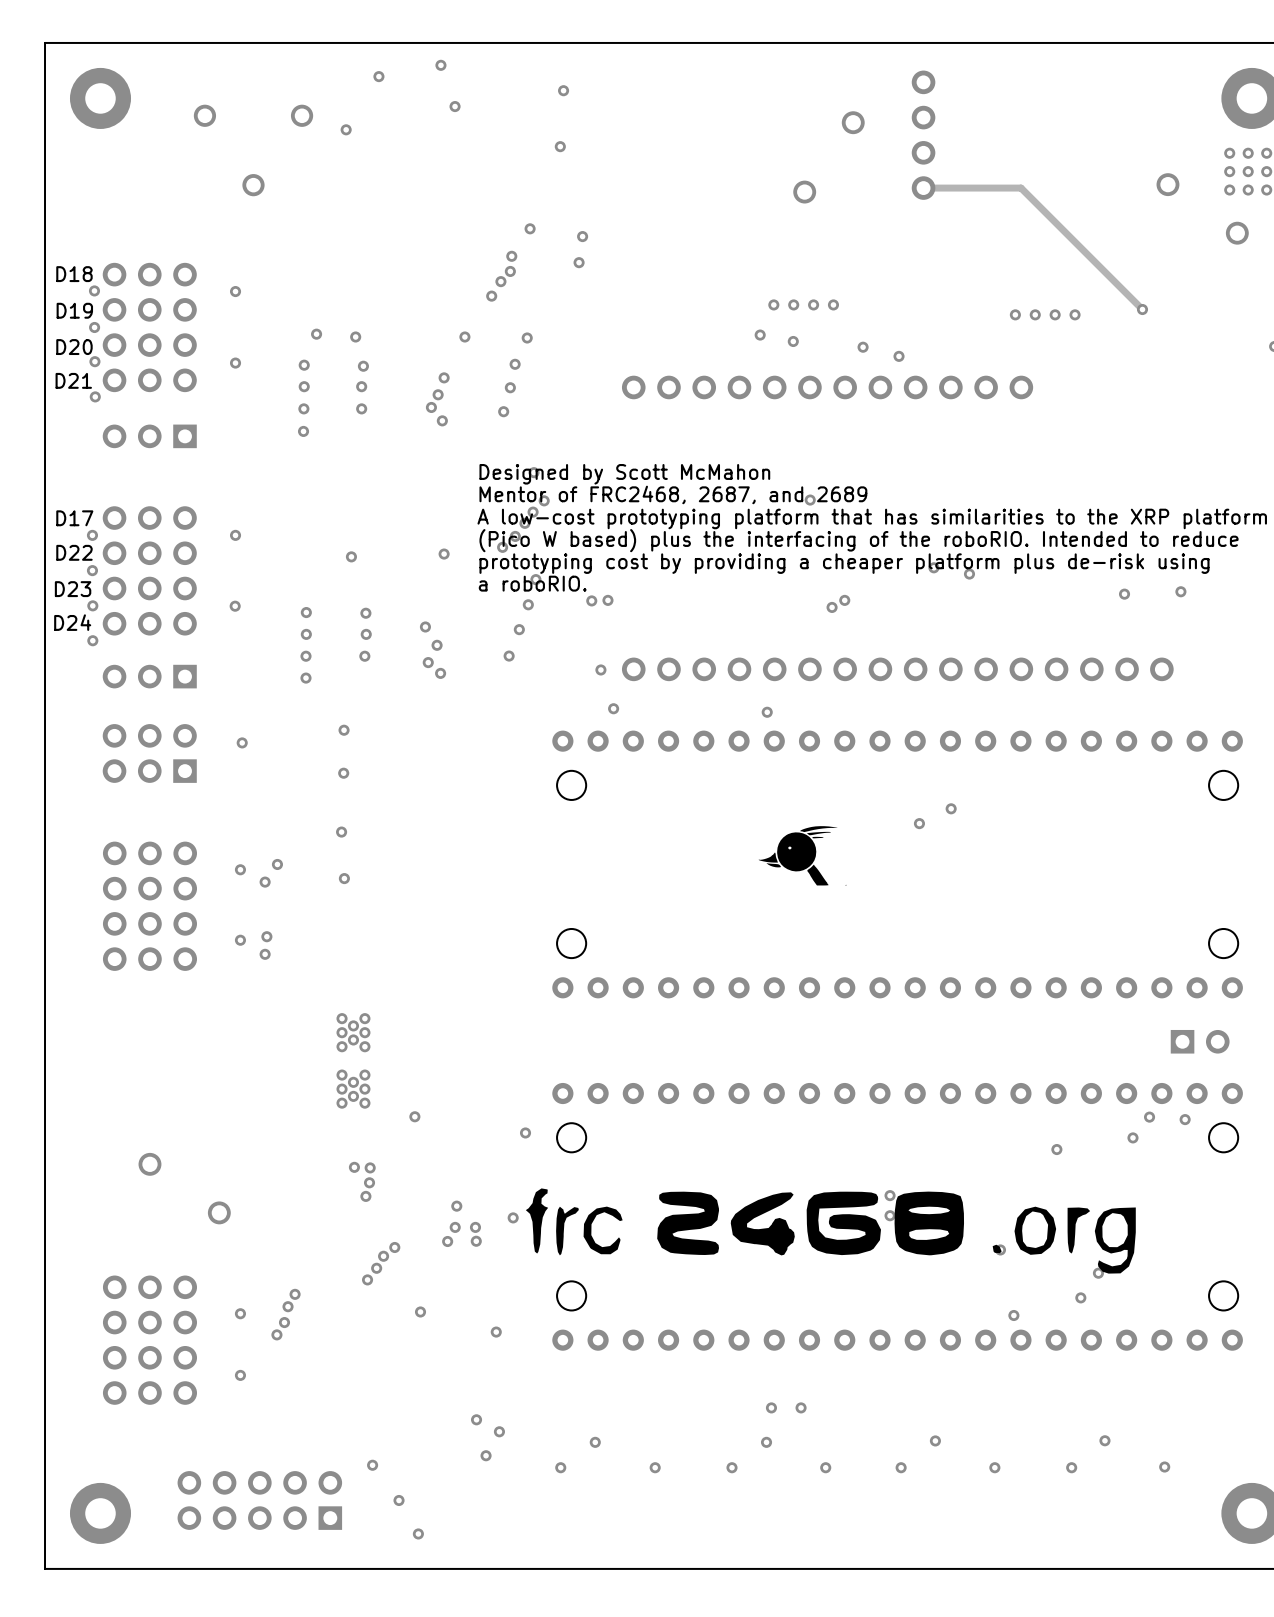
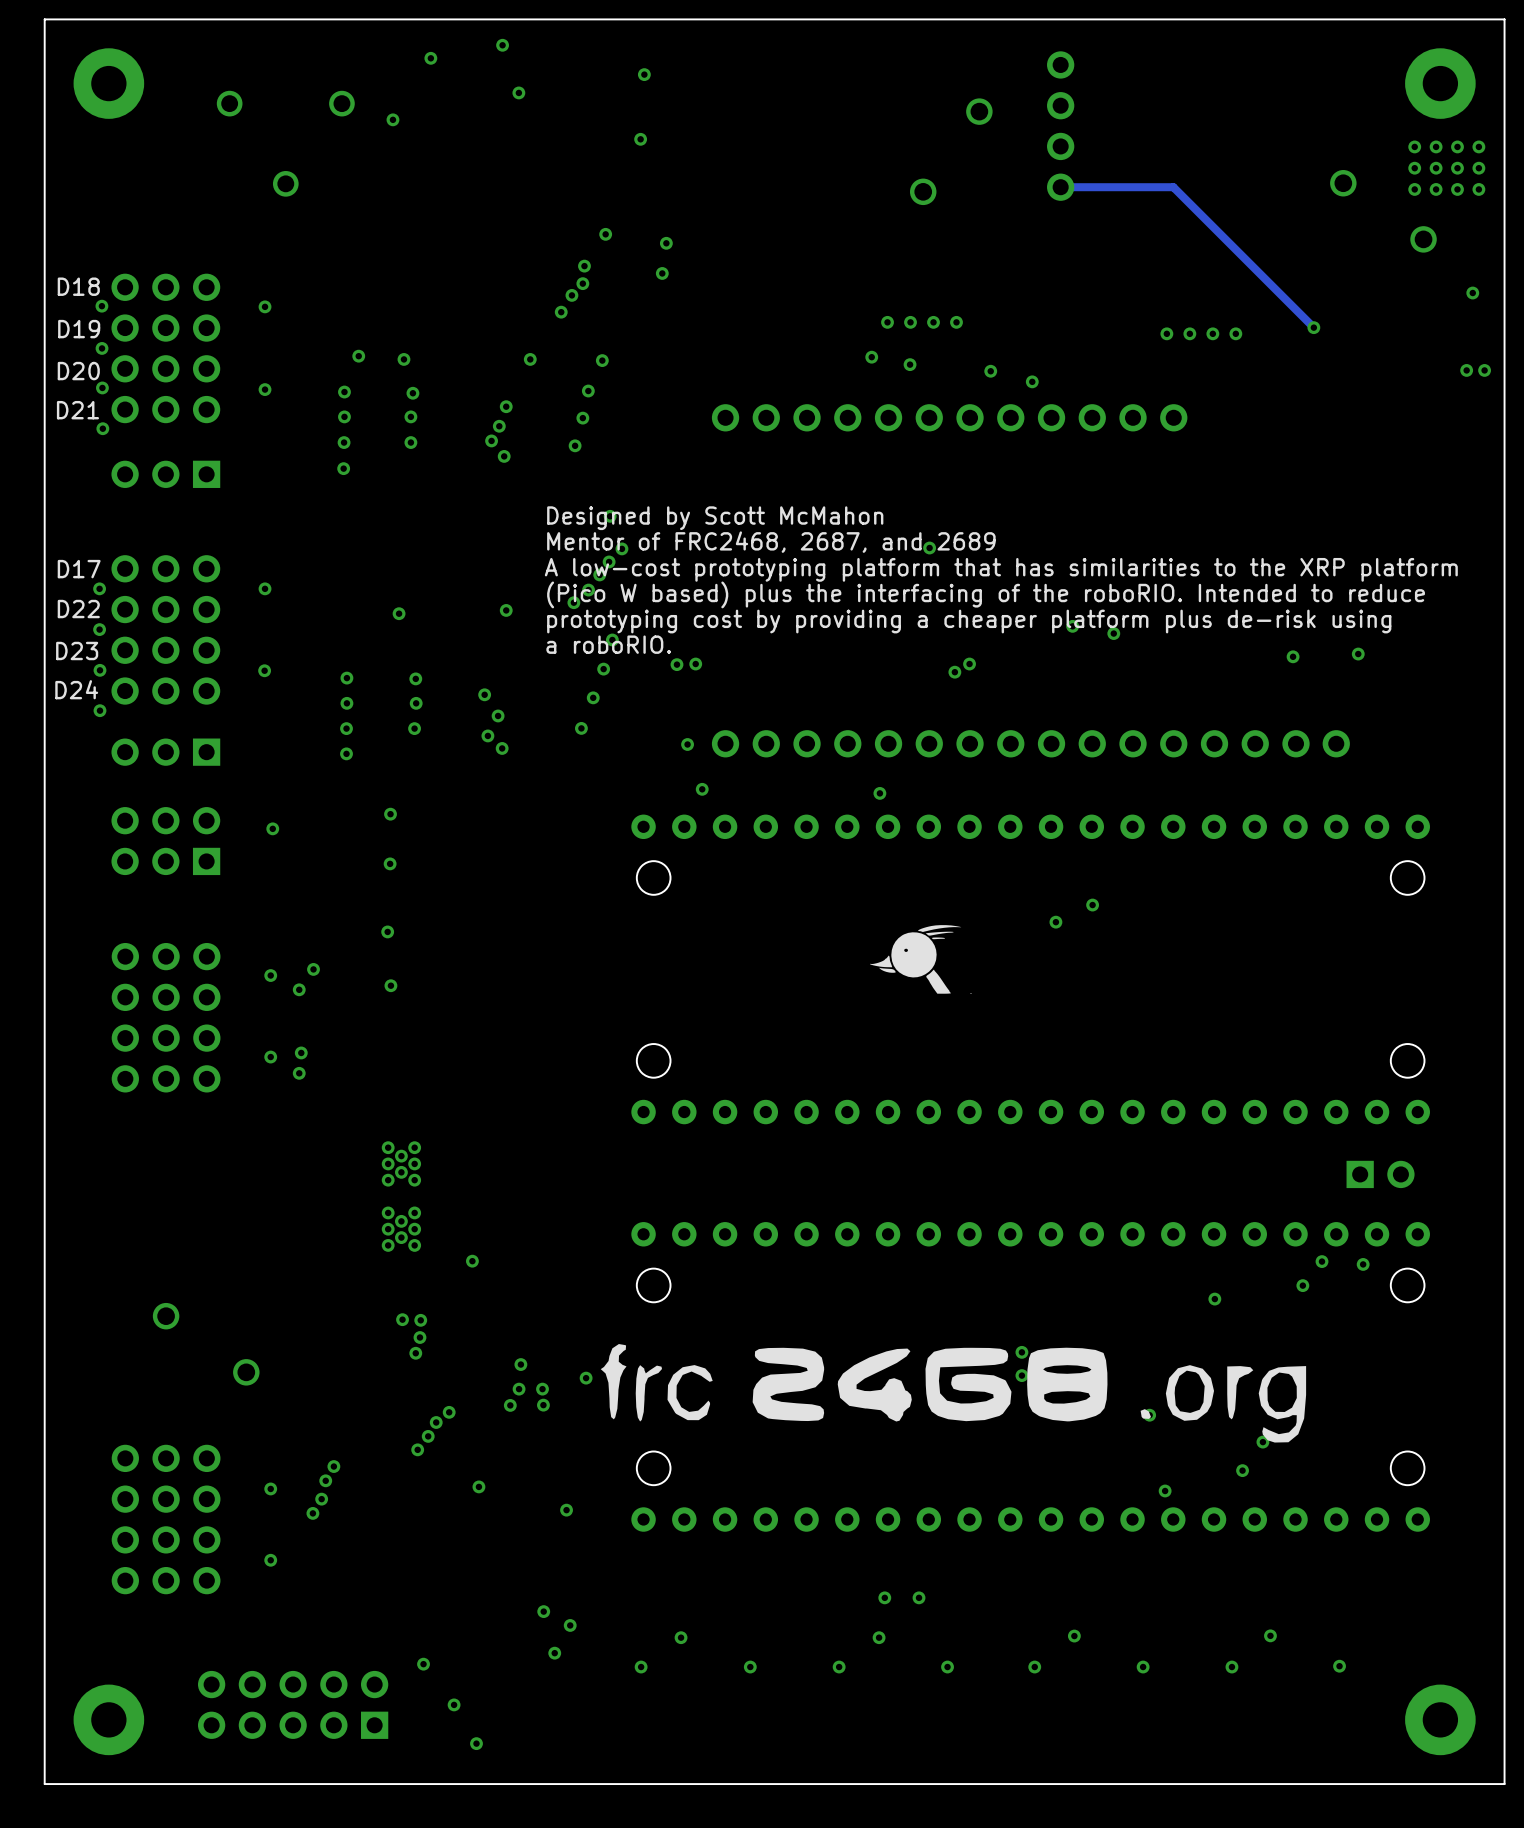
via: (525, 1132) -> none

